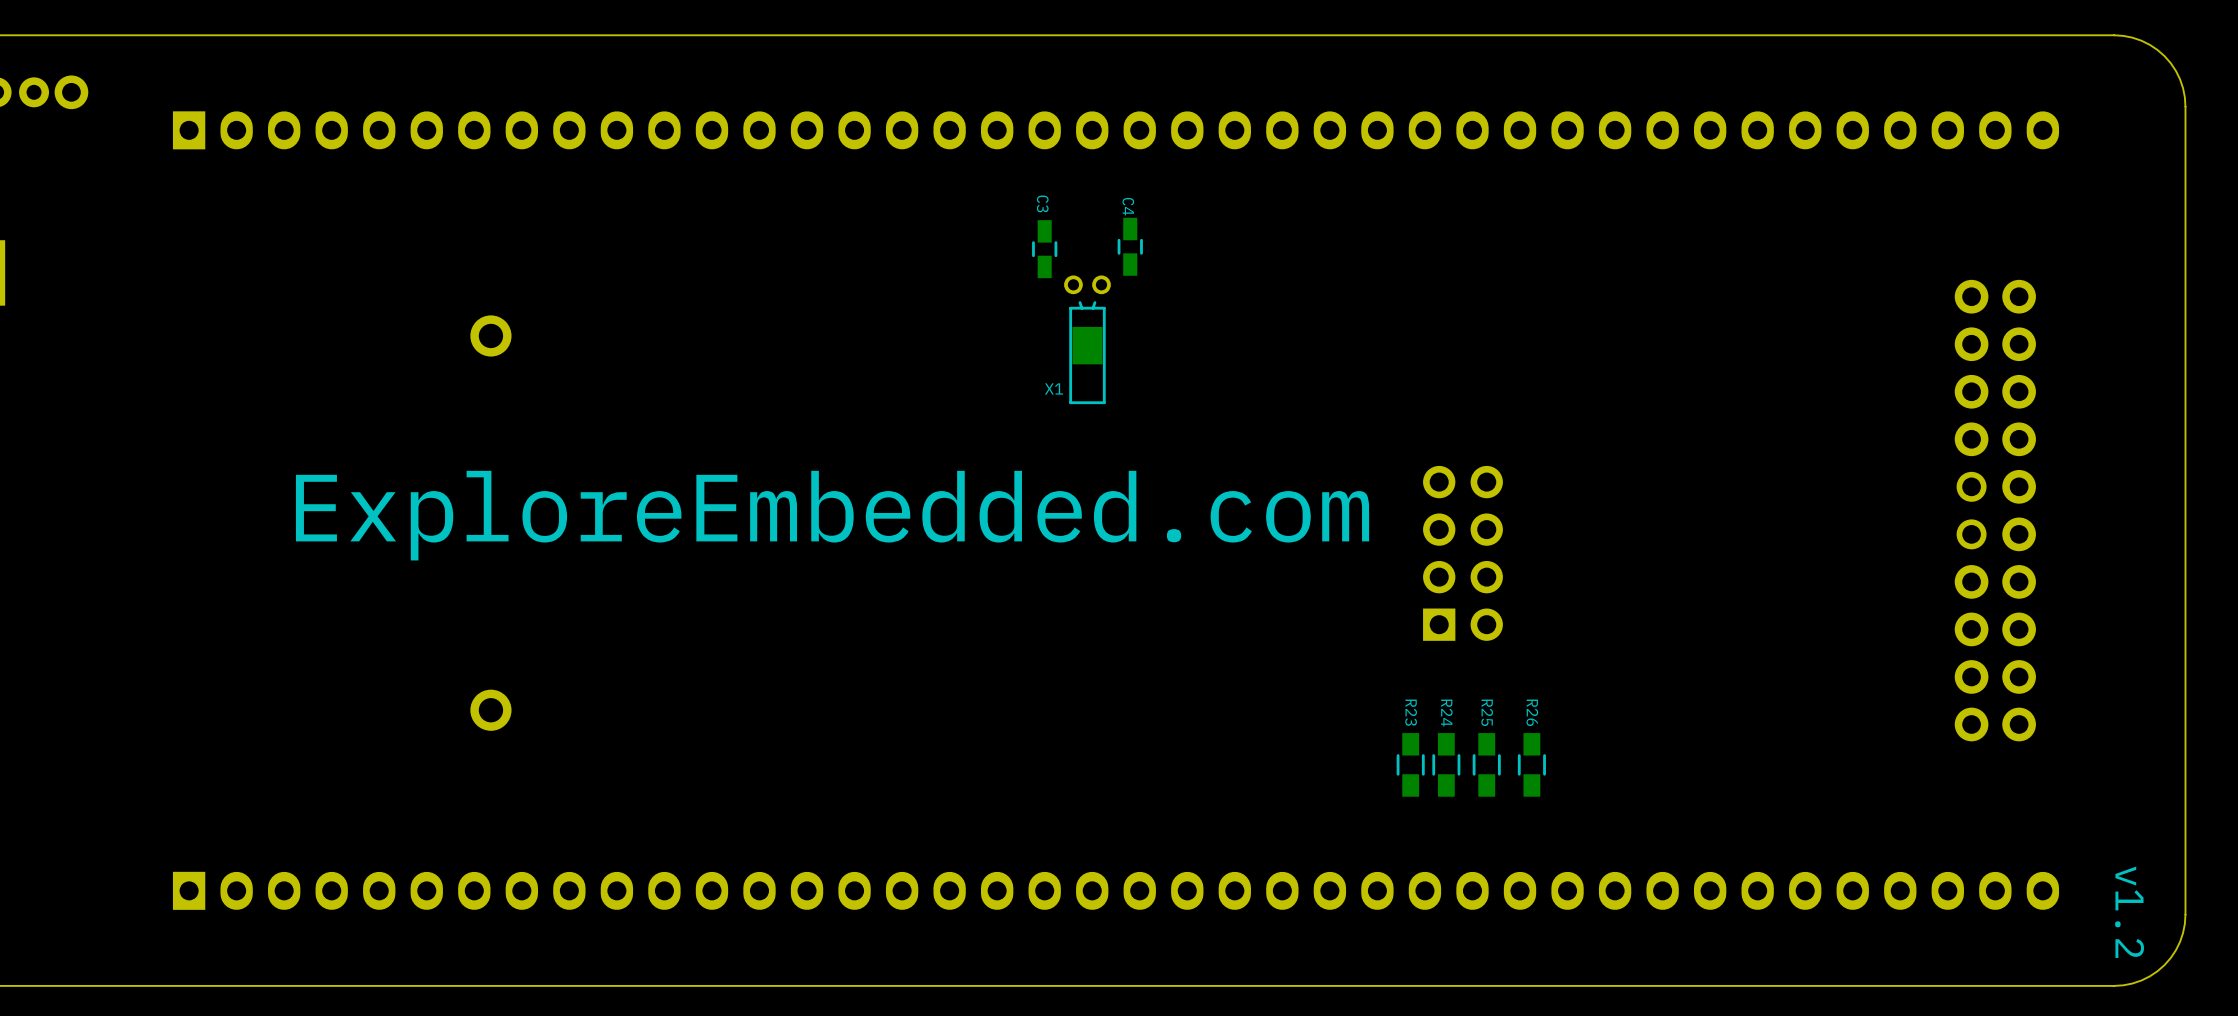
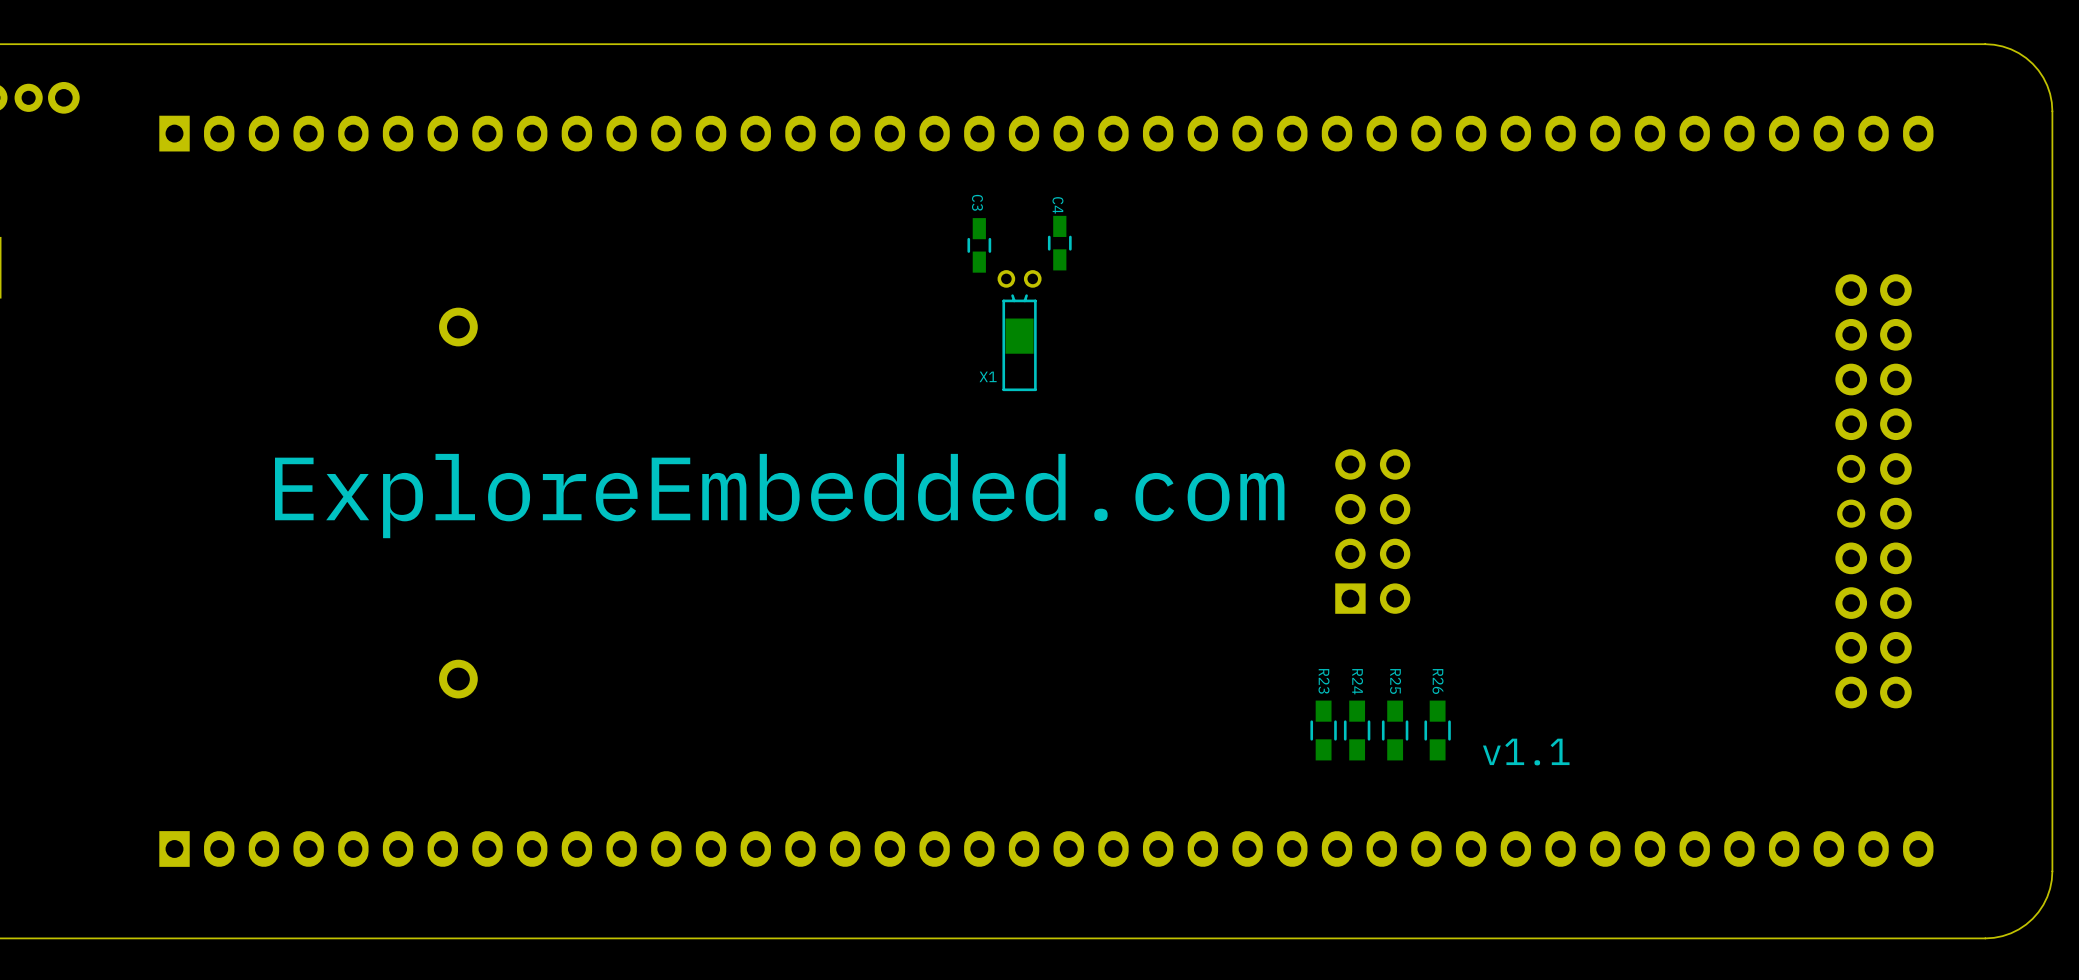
text: none -> v1.1 (1526, 752)
text: v1.2 (2129, 912) -> none

